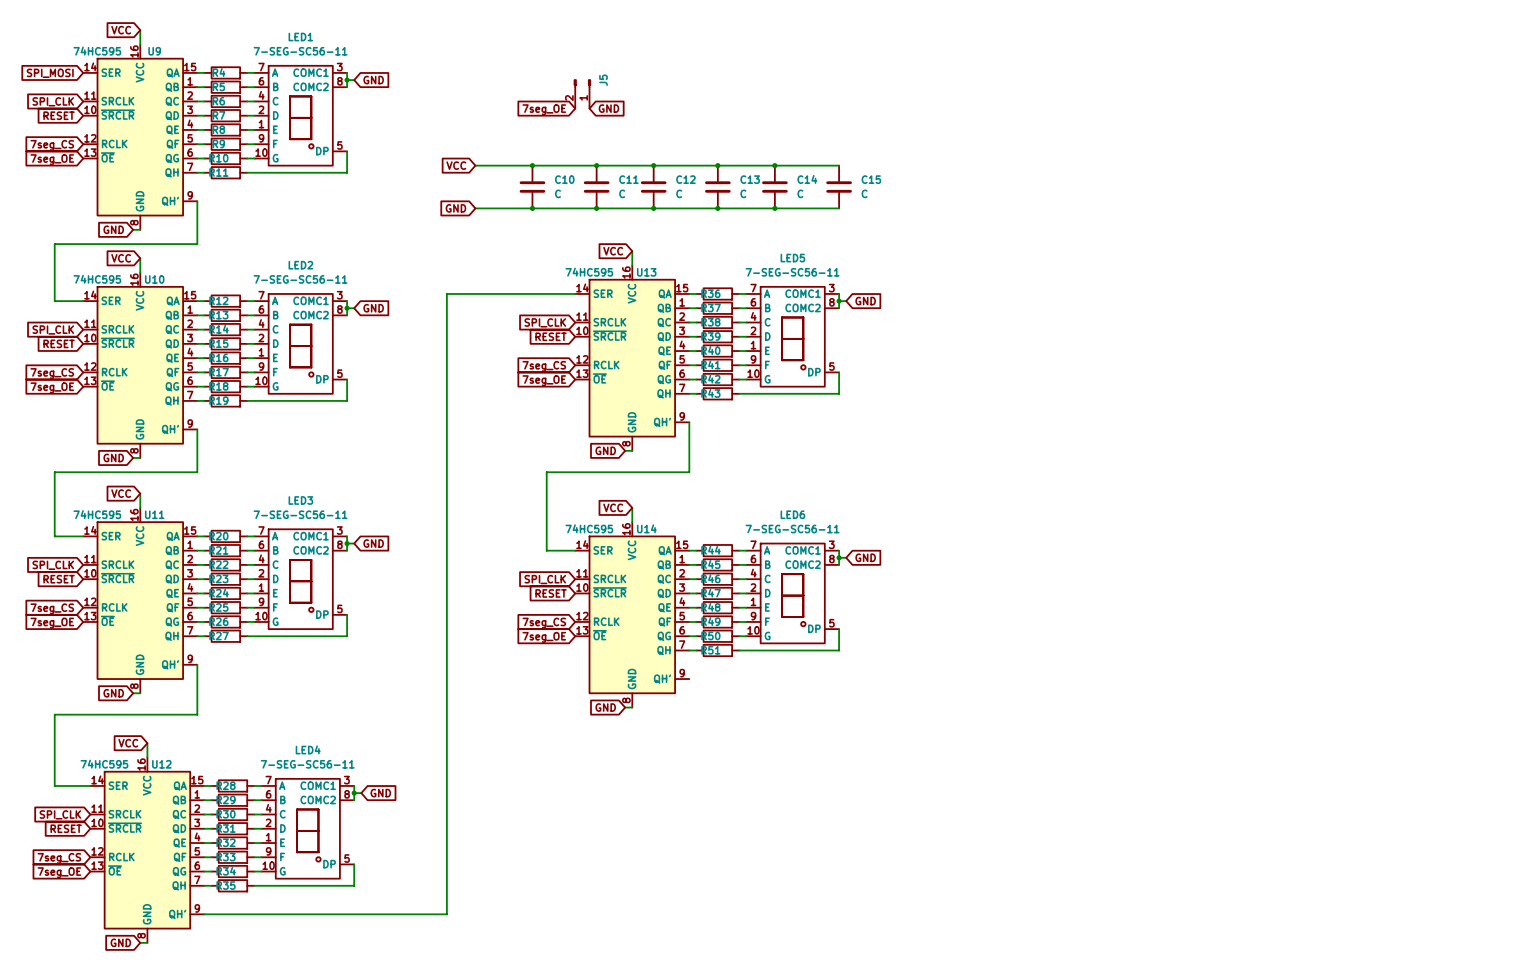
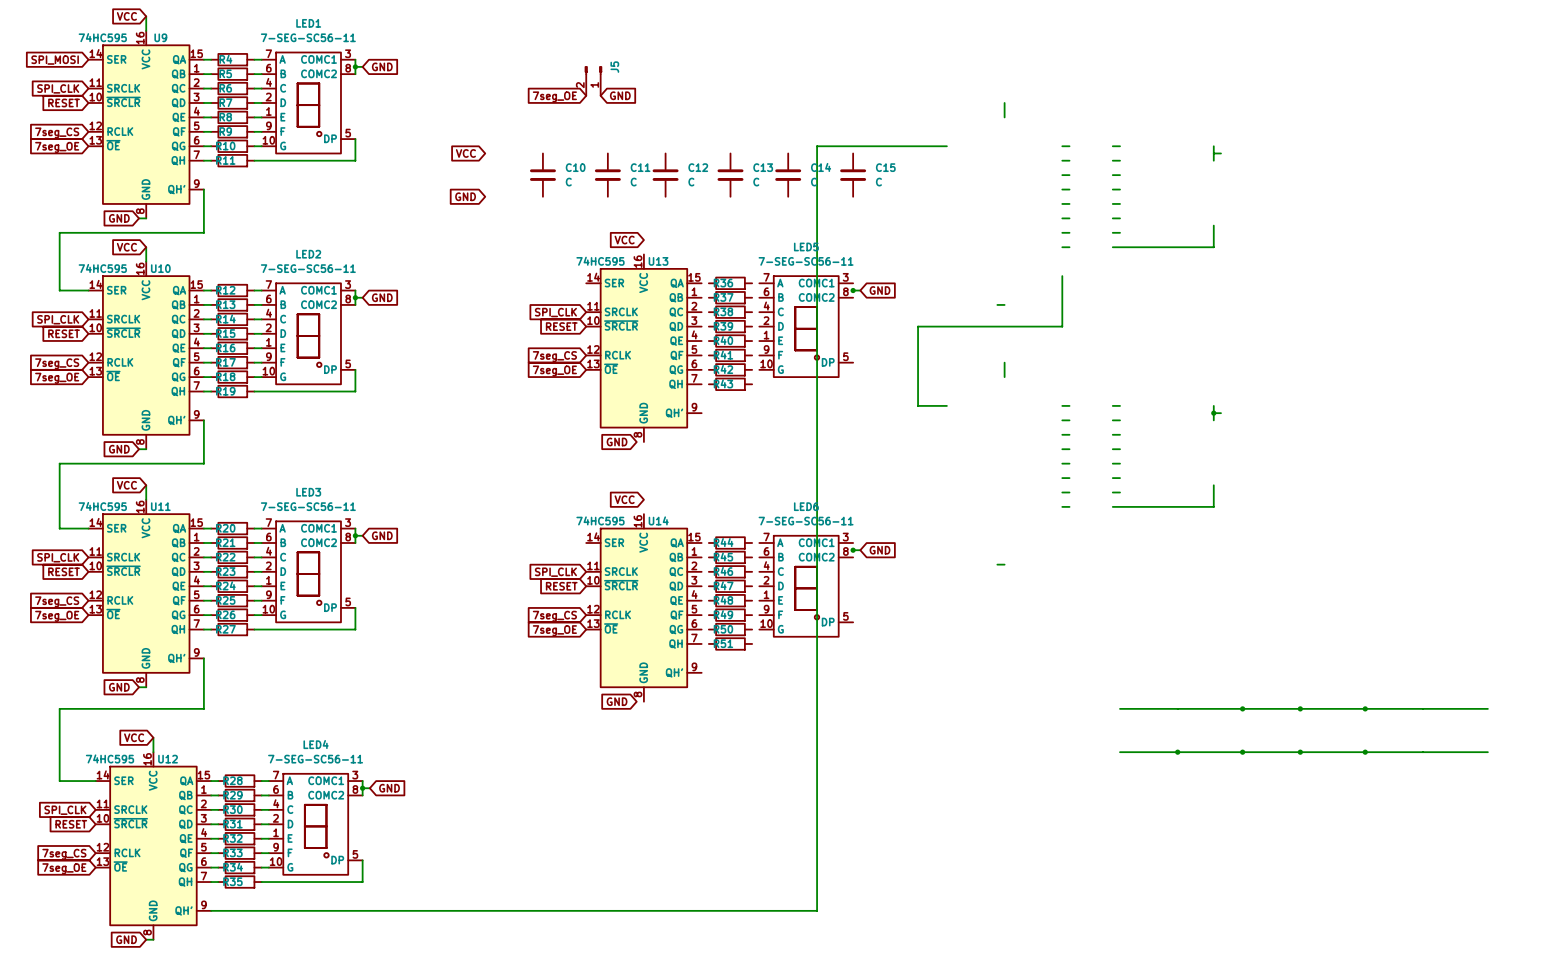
wire: none -> (1004, 102) (1004, 117)
wire: none -> (1062, 146) (1069, 146)
wire: none -> (1112, 146) (1120, 146)
wire: none -> (1213, 146) (1213, 160)
wire: (475, 165) (839, 165) -> none
junction: (532, 165) -> none
junction: (596, 165) -> none
junction: (653, 165) -> none
junction: (717, 165) -> none
junction: (774, 165) -> none
wire: none -> (1213, 153) (1220, 153)
wire: none -> (1062, 160) (1069, 160)
wire: none -> (1112, 160) (1120, 160)
wire: none -> (1062, 175) (1069, 175)
wire: none -> (1112, 175) (1120, 175)
wire: none -> (1062, 189) (1069, 189)
wire: none -> (1112, 189) (1120, 189)
wire: (475, 208) (839, 208) -> none
junction: (532, 208) -> none
junction: (596, 208) -> none
junction: (653, 208) -> none
junction: (717, 208) -> none
junction: (774, 208) -> none
wire: none -> (1062, 203) (1069, 203)
wire: none -> (1112, 203) (1120, 203)
wire: none -> (1062, 218) (1069, 218)
wire: none -> (1112, 218) (1120, 218)
wire: none -> (1213, 225) (1213, 247) (1112, 247)
wire: none -> (1062, 232) (1069, 232)
wire: none -> (1112, 232) (1120, 232)
wire: (632, 251) (632, 265) -> none
wire: none -> (1062, 247) (1069, 247)
wire: none -> (1062, 276) (1062, 326) (918, 326) (918, 405) (946, 405)
wire: (575, 293) (446, 293) (446, 914) -> (946, 146) (817, 146) (817, 910) (456, 910)
wire: (689, 293) (696, 293) -> none
wire: (739, 293) (746, 293) -> none
wire: (839, 293) (839, 308) -> none
wire: (689, 308) (696, 308) -> none
wire: (739, 308) (746, 308) -> none
wire: none -> (997, 304) (1004, 304)
wire: (689, 322) (696, 322) -> none
wire: (739, 322) (746, 322) -> none
wire: (689, 336) (696, 336) -> none
wire: (739, 336) (746, 336) -> none
wire: (689, 351) (696, 351) -> none
wire: (739, 351) (746, 351) -> none
wire: (689, 365) (696, 365) -> none
wire: (739, 365) (746, 365) -> none
wire: (839, 372) (839, 393) (739, 393) -> none
wire: none -> (1004, 362) (1004, 377)
wire: (689, 379) (696, 379) -> none
wire: (739, 379) (746, 379) -> none
wire: (689, 393) (696, 393) -> none
wire: none -> (1062, 405) (1069, 405)
wire: none -> (1112, 405) (1120, 405)
wire: none -> (1213, 405) (1213, 420)
wire: (689, 422) (689, 472) (546, 472) (546, 550) (575, 550) -> none
wire: none -> (1213, 413) (1220, 413)
junction: none -> (1213, 413)
wire: none -> (1062, 420) (1069, 420)
wire: none -> (1112, 420) (1120, 420)
wire: none -> (1062, 434) (1069, 434)
wire: none -> (1112, 434) (1120, 434)
wire: (625, 450) (632, 450) -> none
wire: none -> (1062, 449) (1069, 449)
wire: none -> (1112, 449) (1120, 449)
wire: none -> (1062, 463) (1069, 463)
wire: none -> (1112, 463) (1120, 463)
wire: none -> (1062, 478) (1069, 478)
wire: none -> (1112, 478) (1120, 478)
wire: none -> (1213, 485) (1213, 506) (1112, 506)
wire: none -> (1062, 492) (1069, 492)
wire: none -> (1112, 492) (1120, 492)
wire: (632, 507) (632, 522) -> none
wire: none -> (1062, 506) (1069, 506)
wire: (689, 550) (696, 550) -> none
wire: (739, 550) (746, 550) -> none
wire: (839, 550) (839, 564) -> none
wire: (689, 564) (696, 564) -> none
wire: (739, 564) (746, 564) -> none
wire: none -> (997, 564) (1004, 564)
wire: (689, 579) (696, 579) -> none
wire: (739, 579) (746, 579) -> none
wire: (689, 593) (696, 593) -> none
wire: (739, 593) (746, 593) -> none
wire: (689, 607) (696, 607) -> none
wire: (739, 607) (746, 607) -> none
wire: (689, 621) (696, 621) -> none
wire: (739, 621) (746, 621) -> none
wire: (839, 629) (839, 650) (739, 650) -> none
wire: (689, 636) (696, 636) -> none
wire: (739, 636) (746, 636) -> none
wire: (689, 650) (696, 650) -> none
wire: (625, 707) (632, 707) -> none
wire: none -> (1120, 708) (1487, 708)
junction: none -> (1242, 708)
junction: none -> (1300, 708)
junction: none -> (1365, 708)
wire: none -> (1120, 752) (1487, 752)
junction: none -> (1177, 752)
junction: none -> (1242, 752)
junction: none -> (1300, 752)
junction: none -> (1365, 752)

